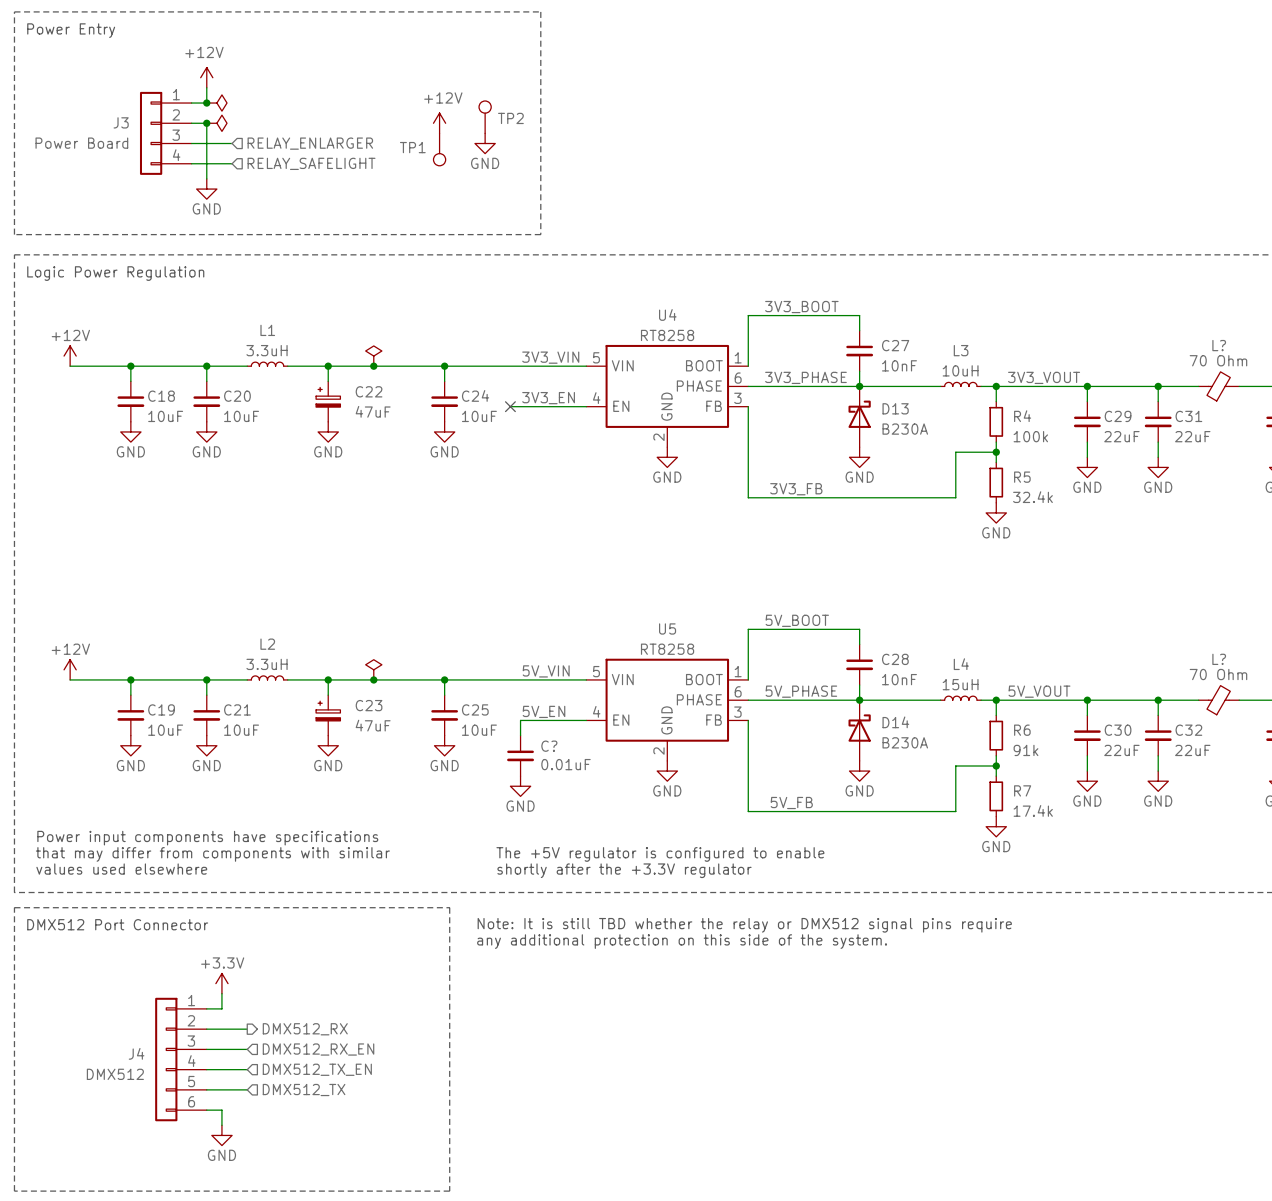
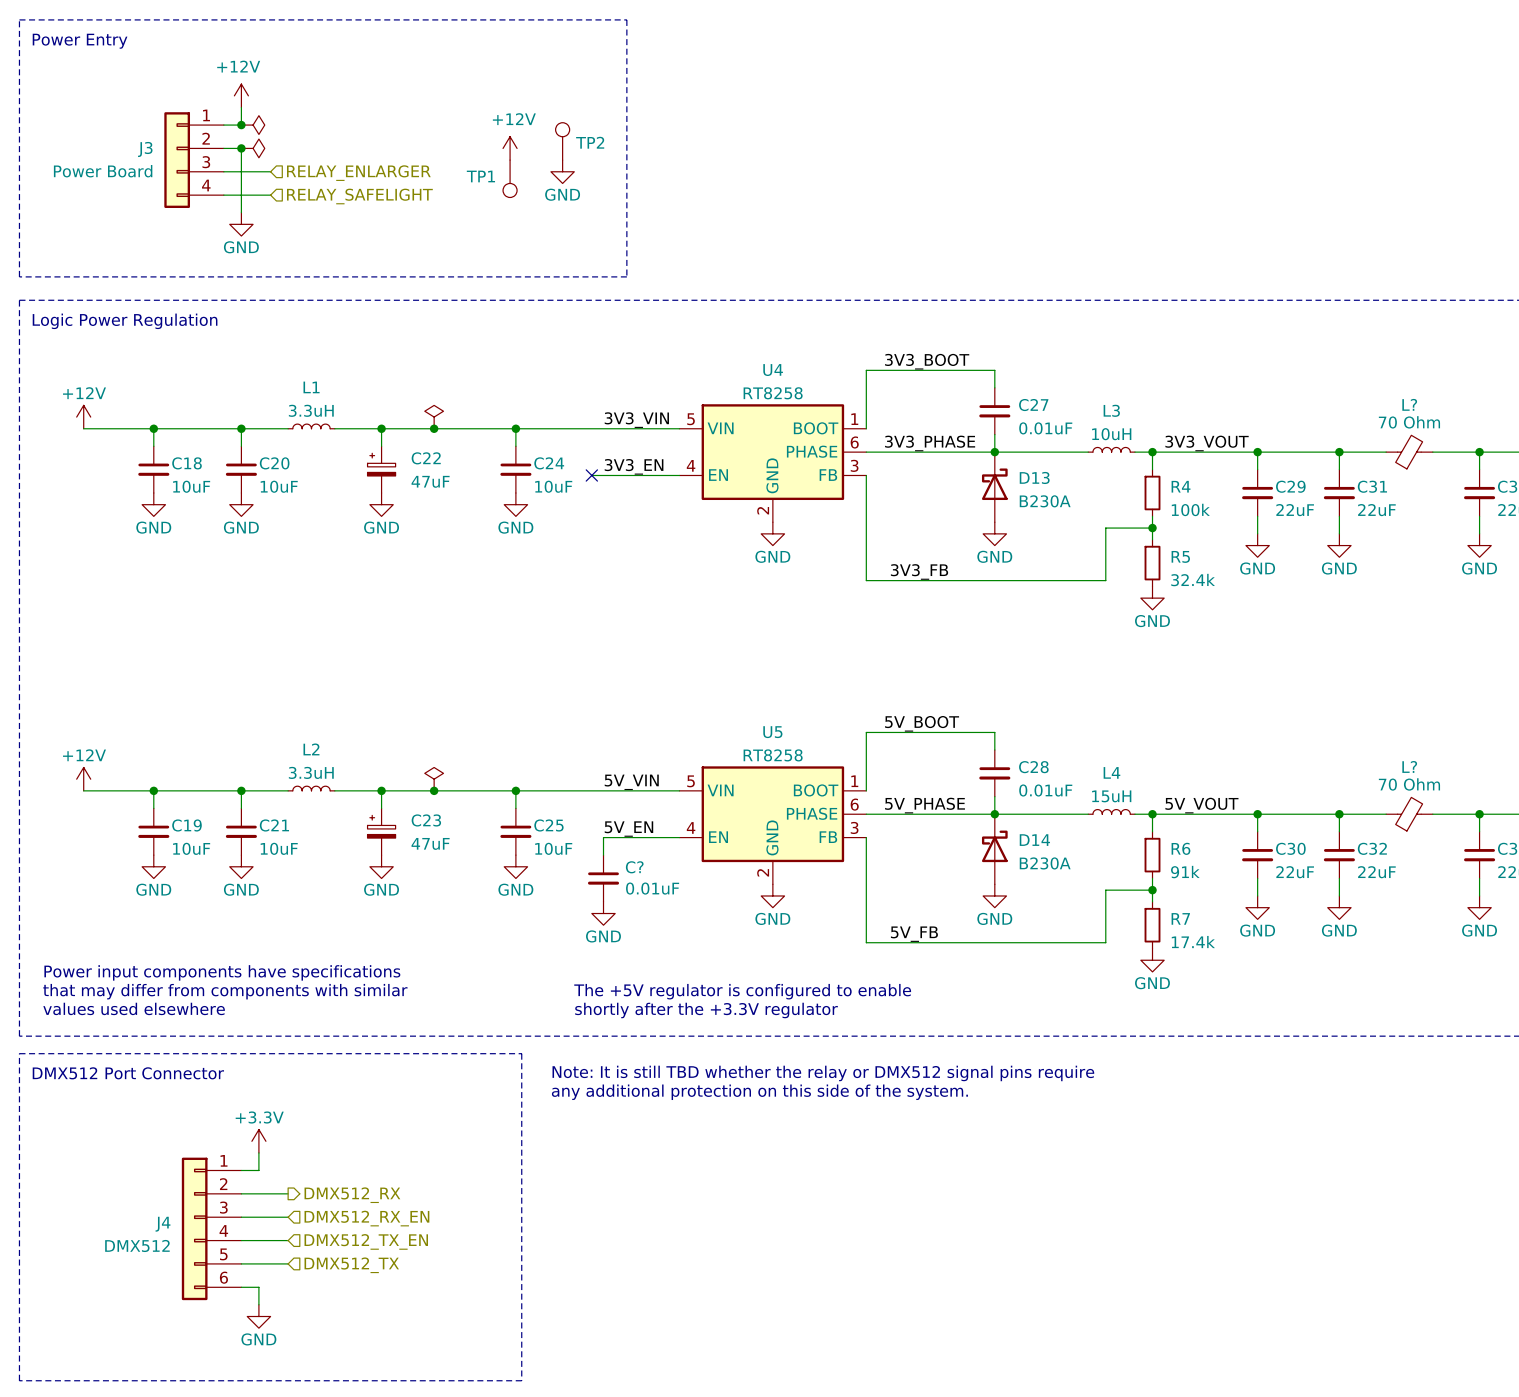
C27 value: 10nF (899, 365) -> 0.01uF (1045, 428)
C28 value: 10nF (899, 679) -> 0.01uF (1045, 790)

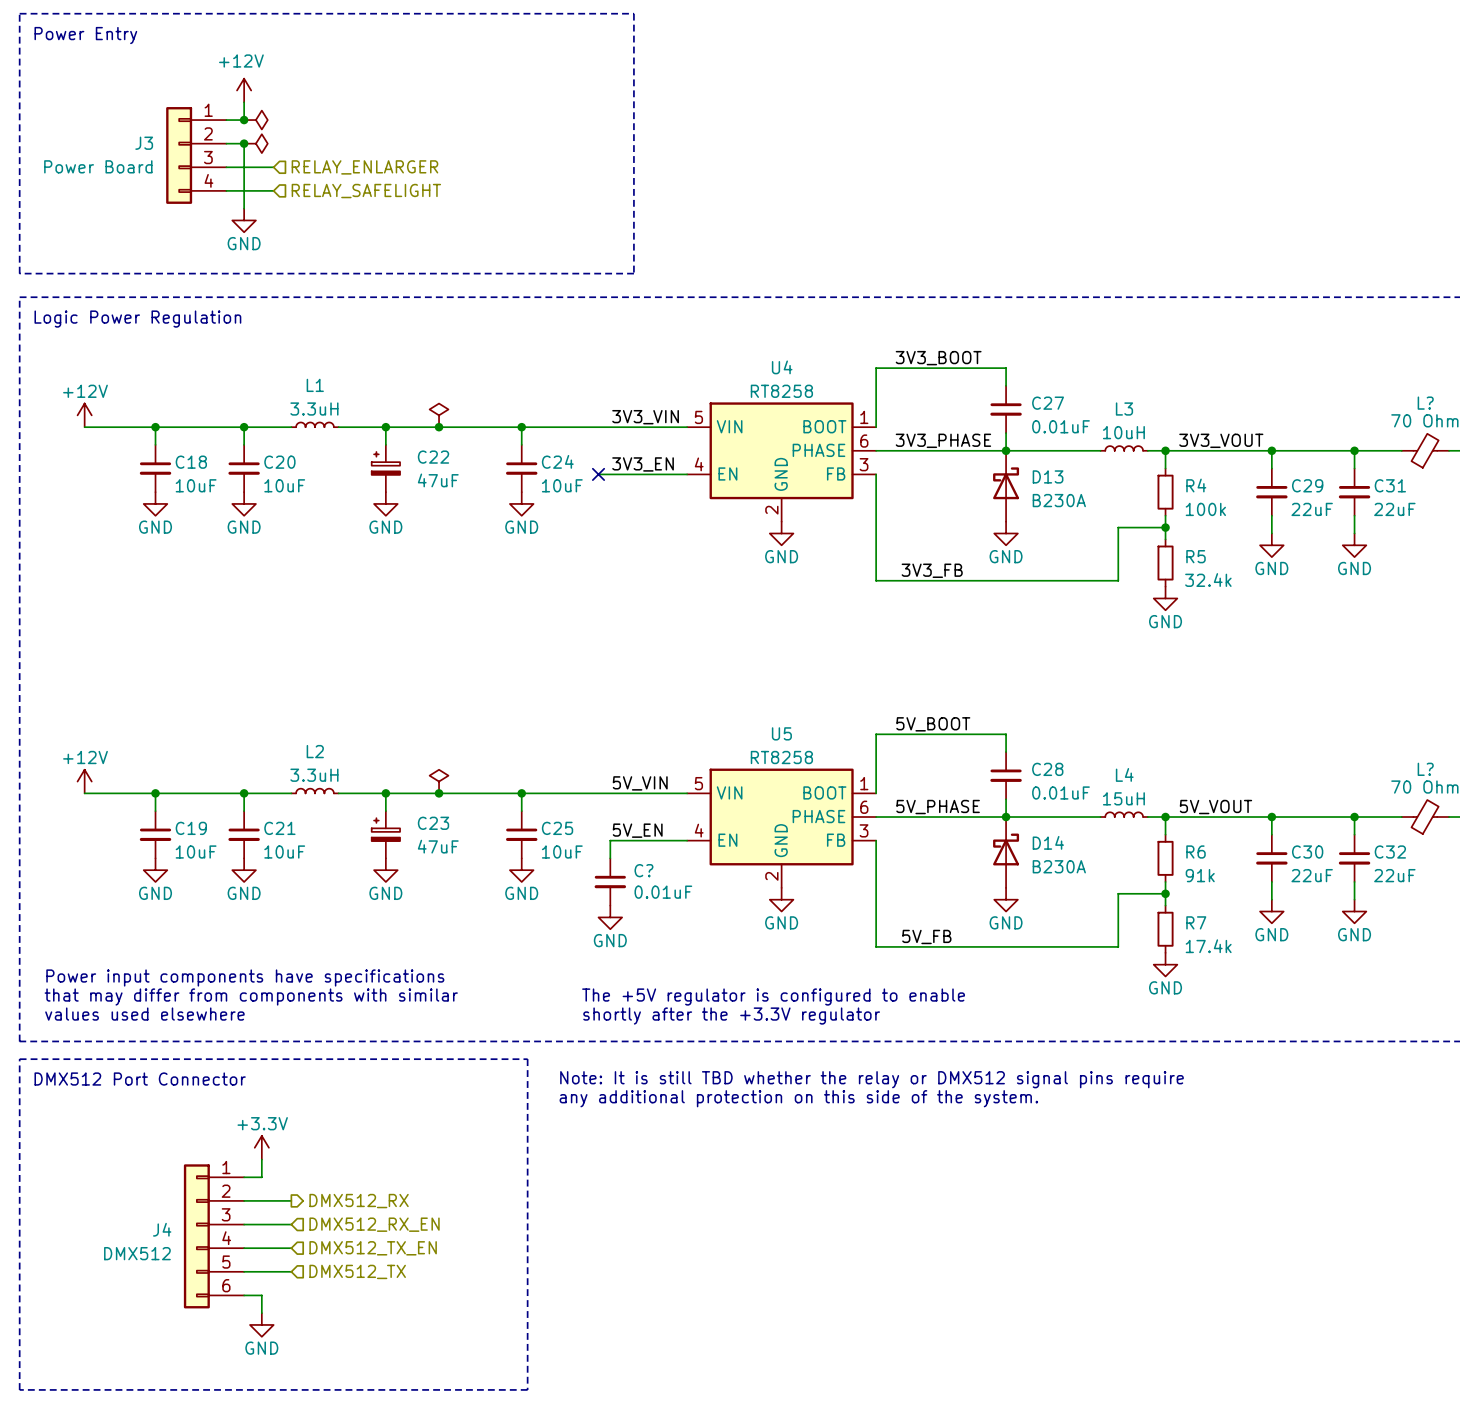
TP2: (562, 141) -> none
power symbol: +12V (510, 148) -> none
power symbol: GND (562, 171) -> none
TP1: (510, 178) -> none

